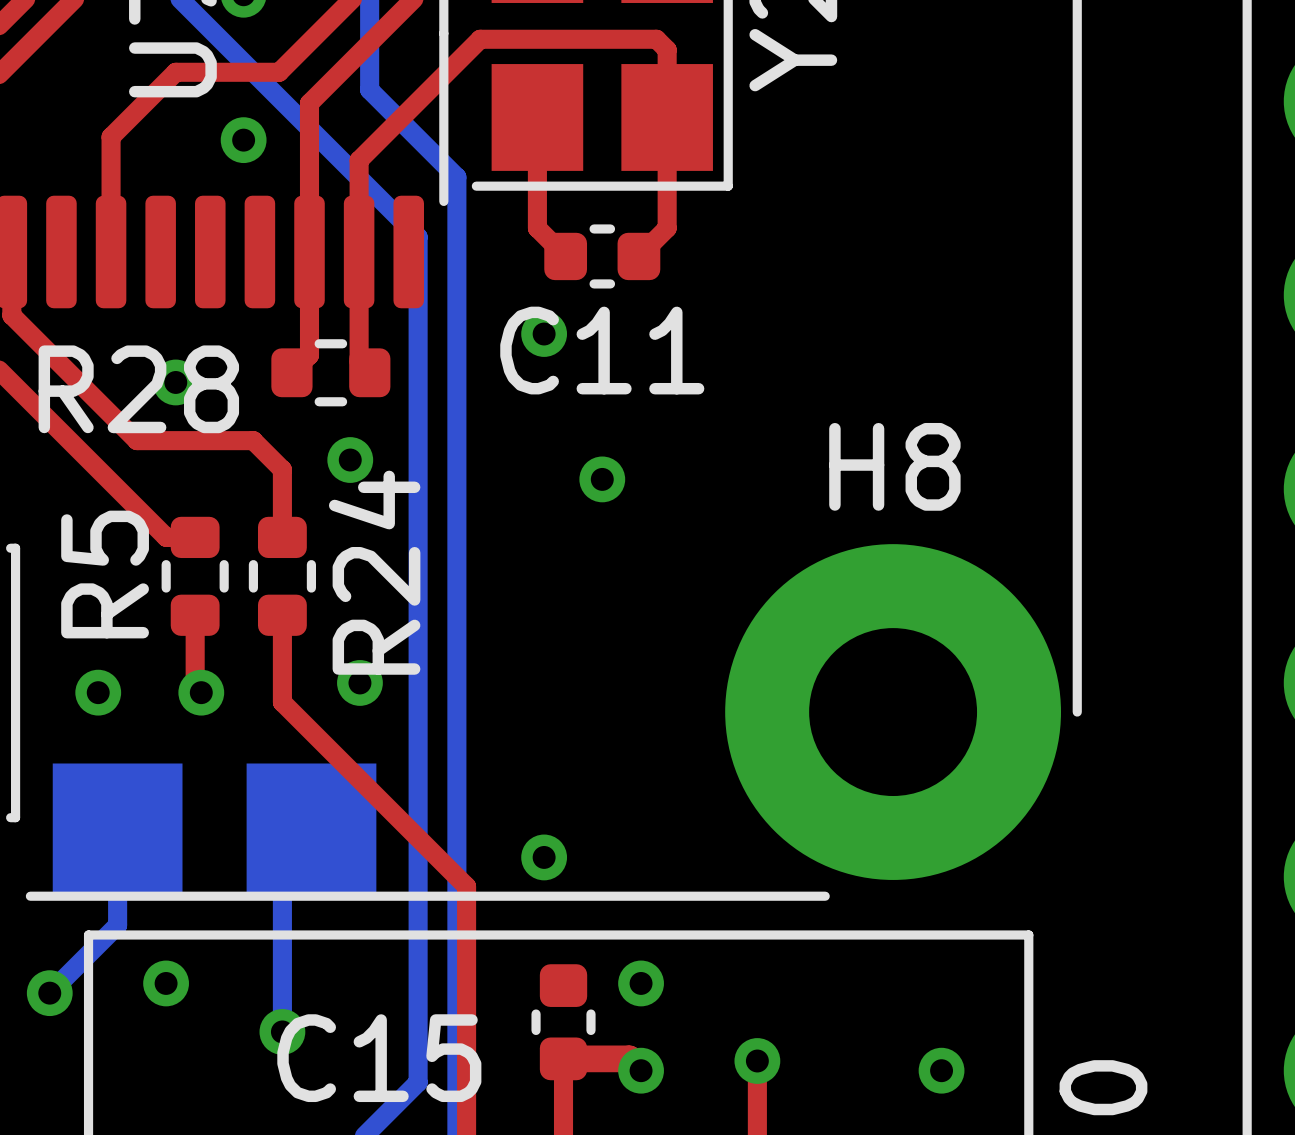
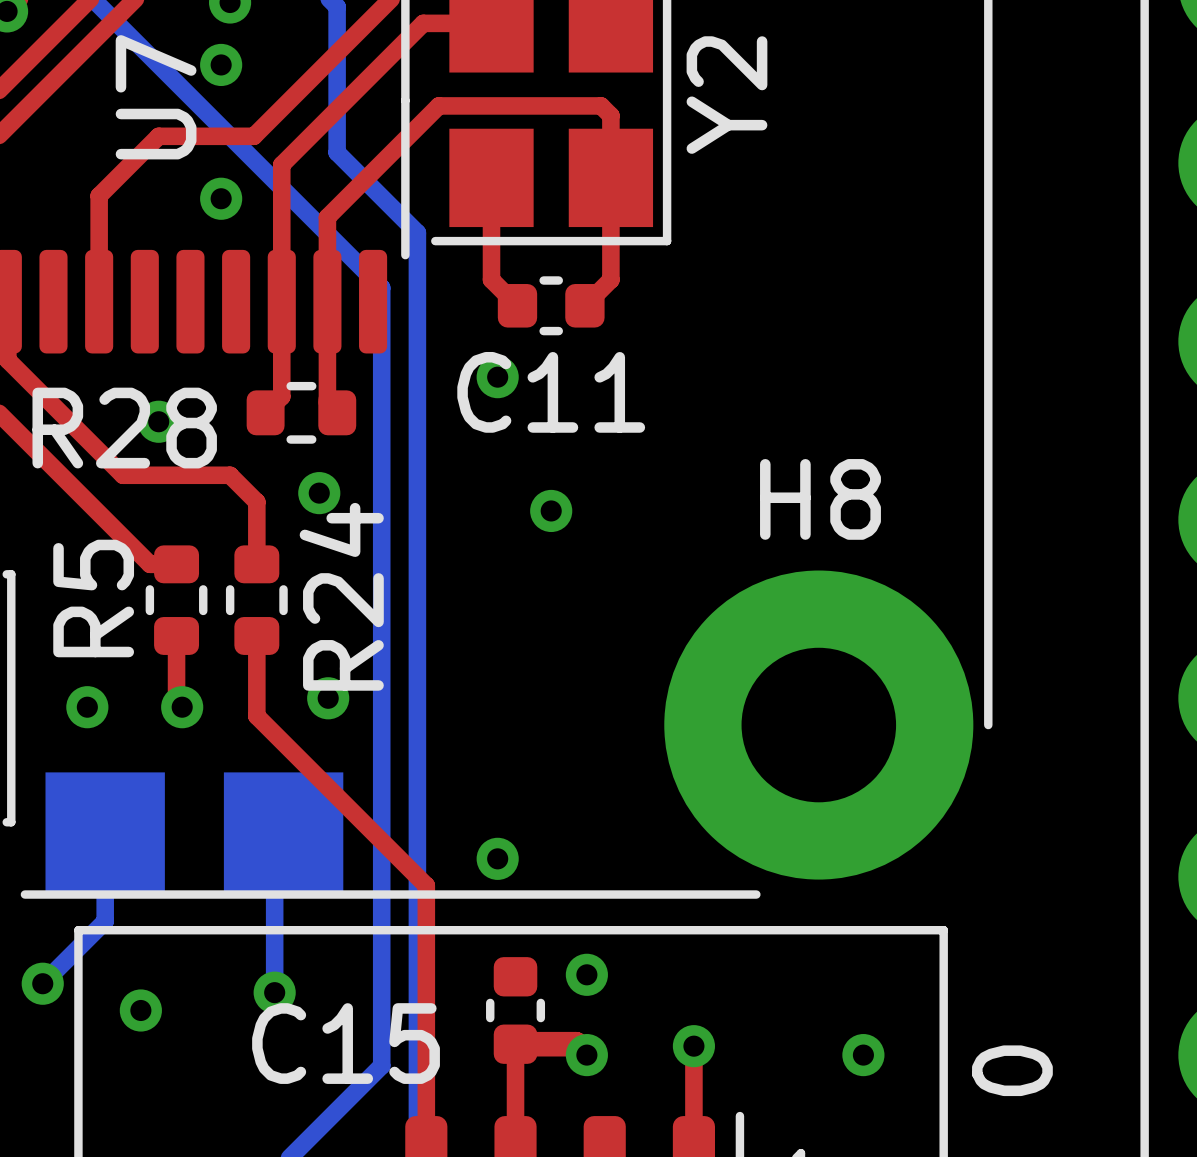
bottom track: (301, 838) (282, 857) (282, 1031) -> (274, 841) (274, 992)
via position: (166, 983) -> (140, 1010)
via position: (282, 1031) -> (274, 992)

